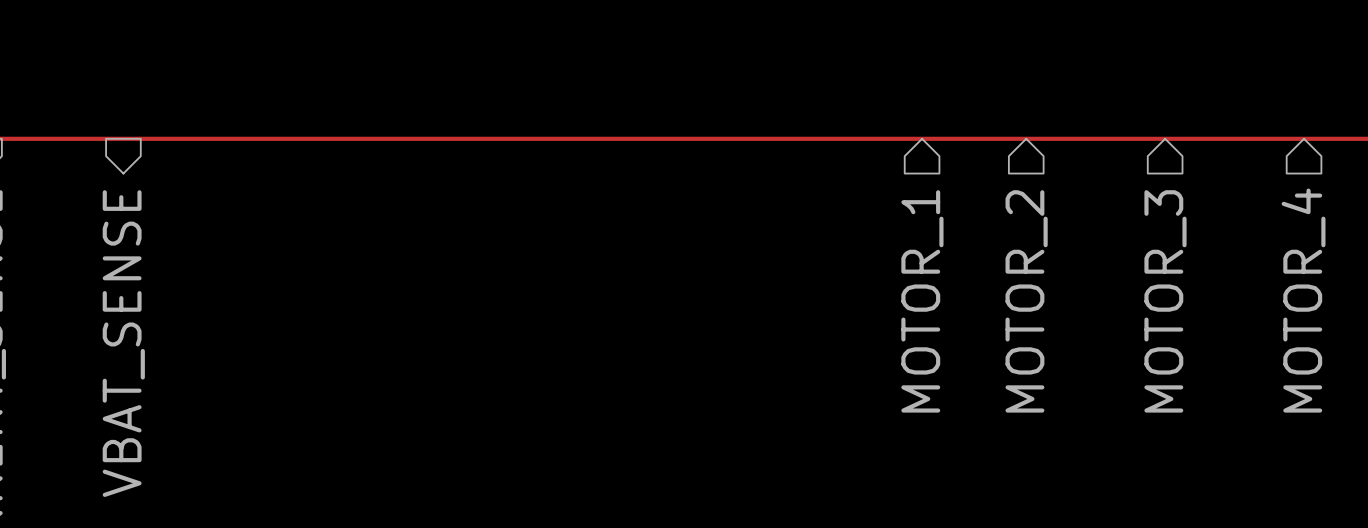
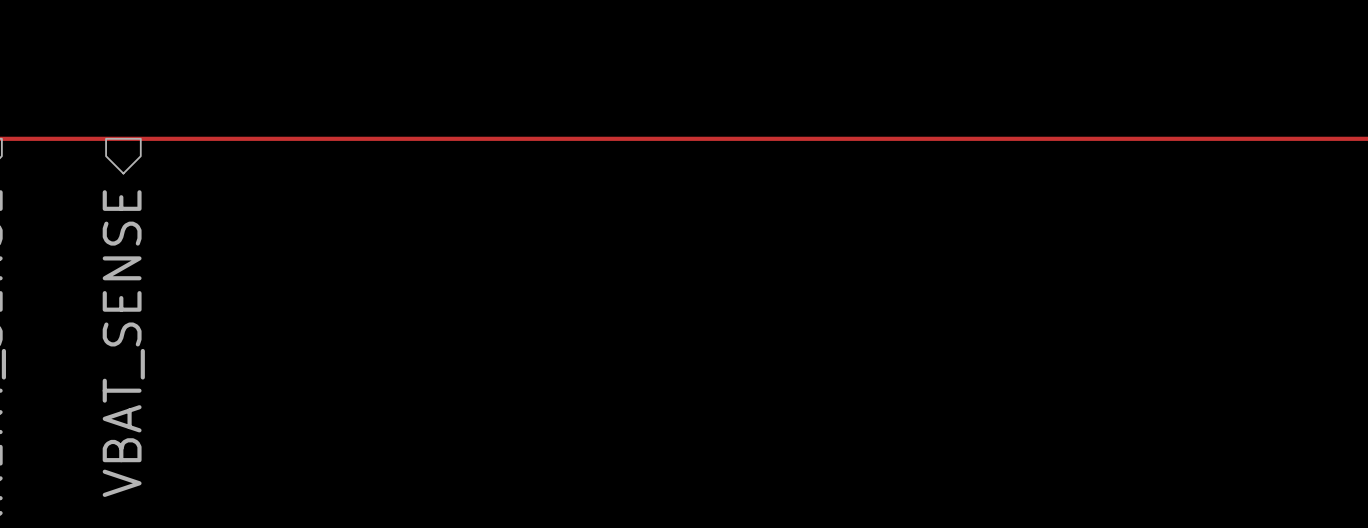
sheet pin: MOTOR_4 (1303, 300) -> none
sheet pin: MOTOR_1 (922, 301) -> none
sheet pin: MOTOR_2 (1026, 301) -> none
sheet pin: MOTOR_3 (1165, 301) -> none

